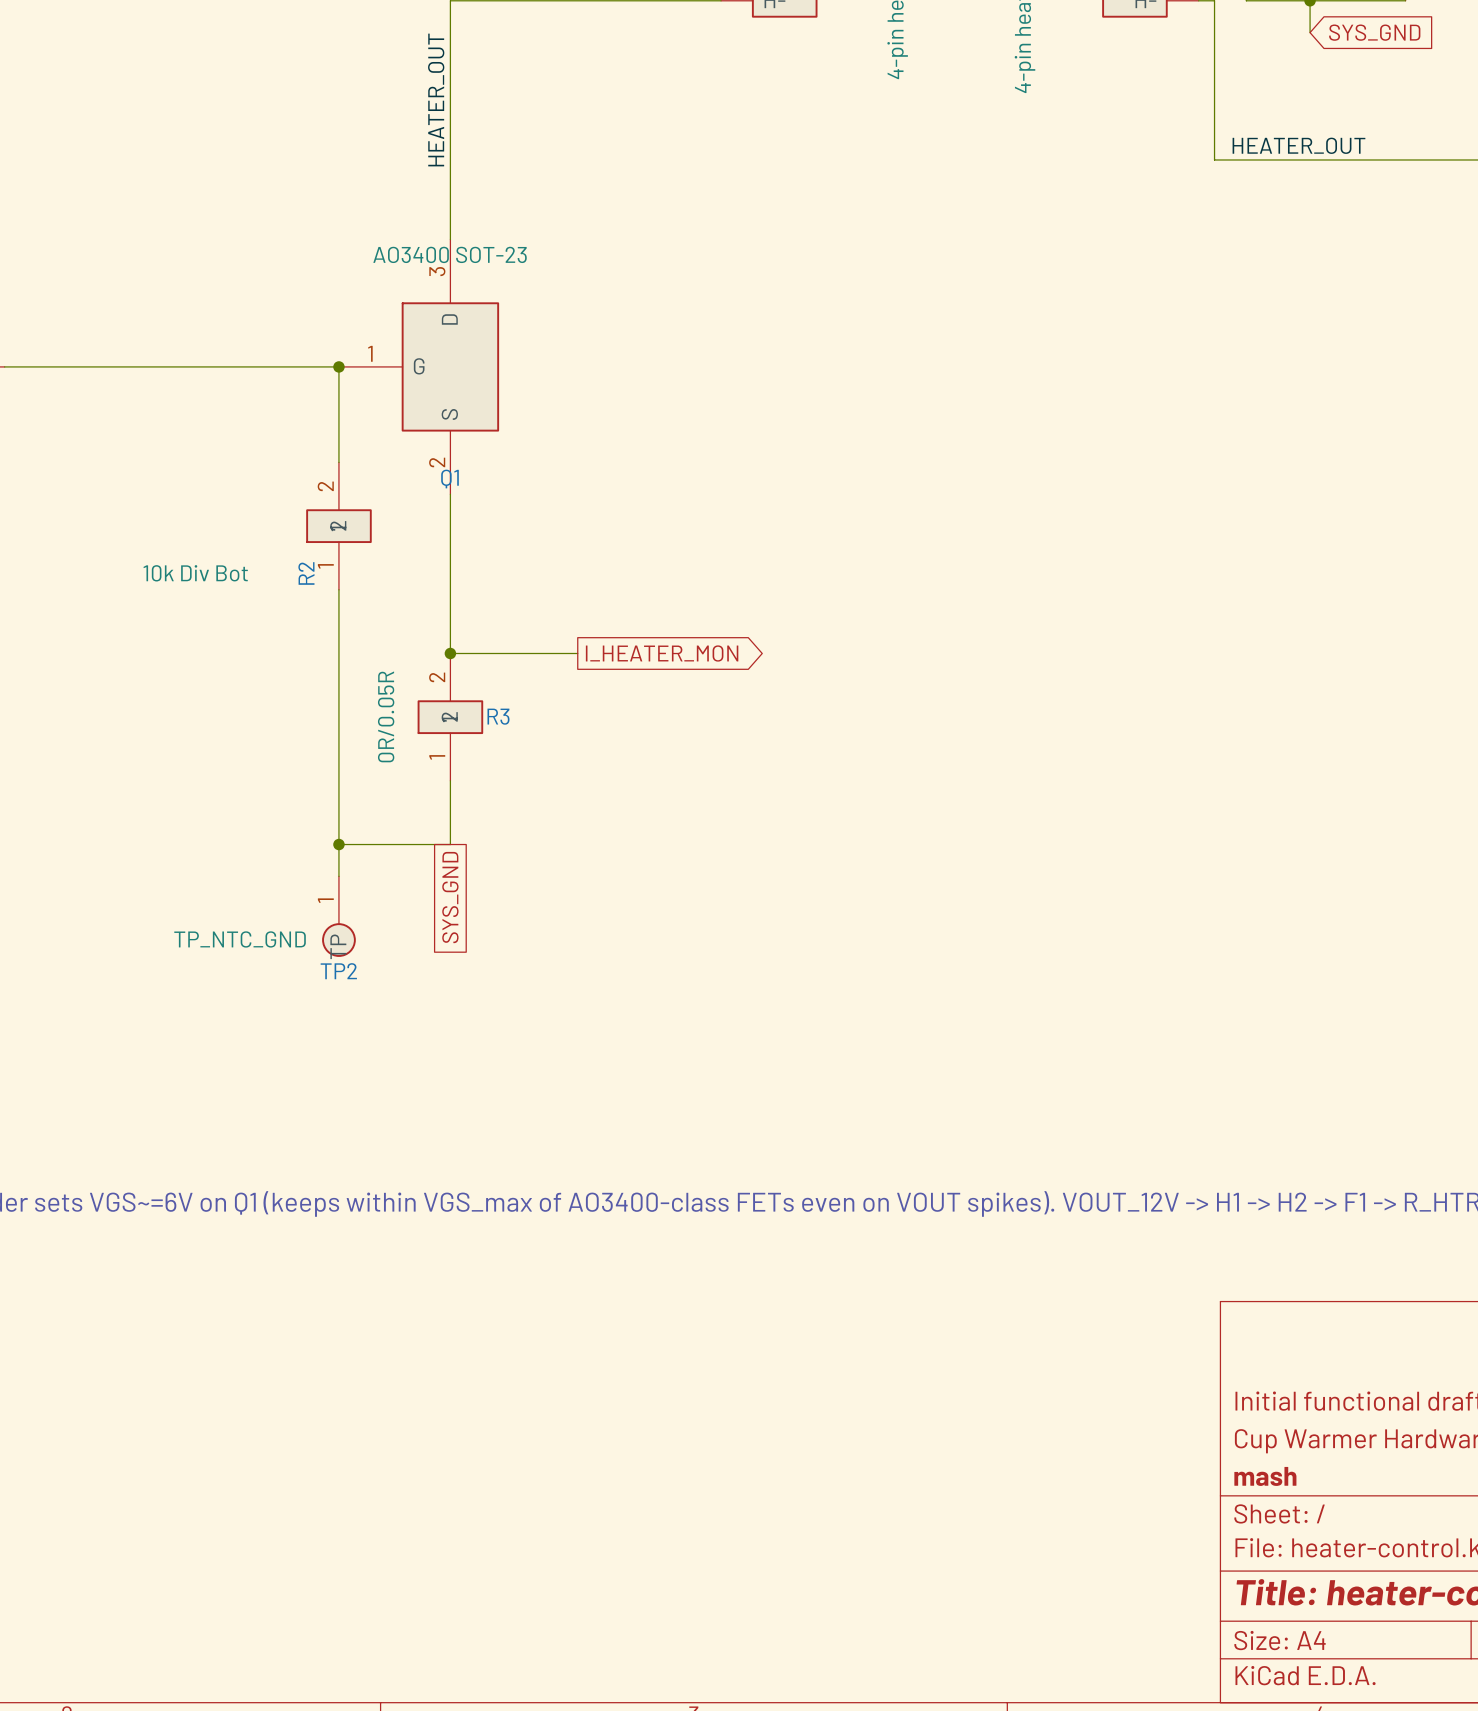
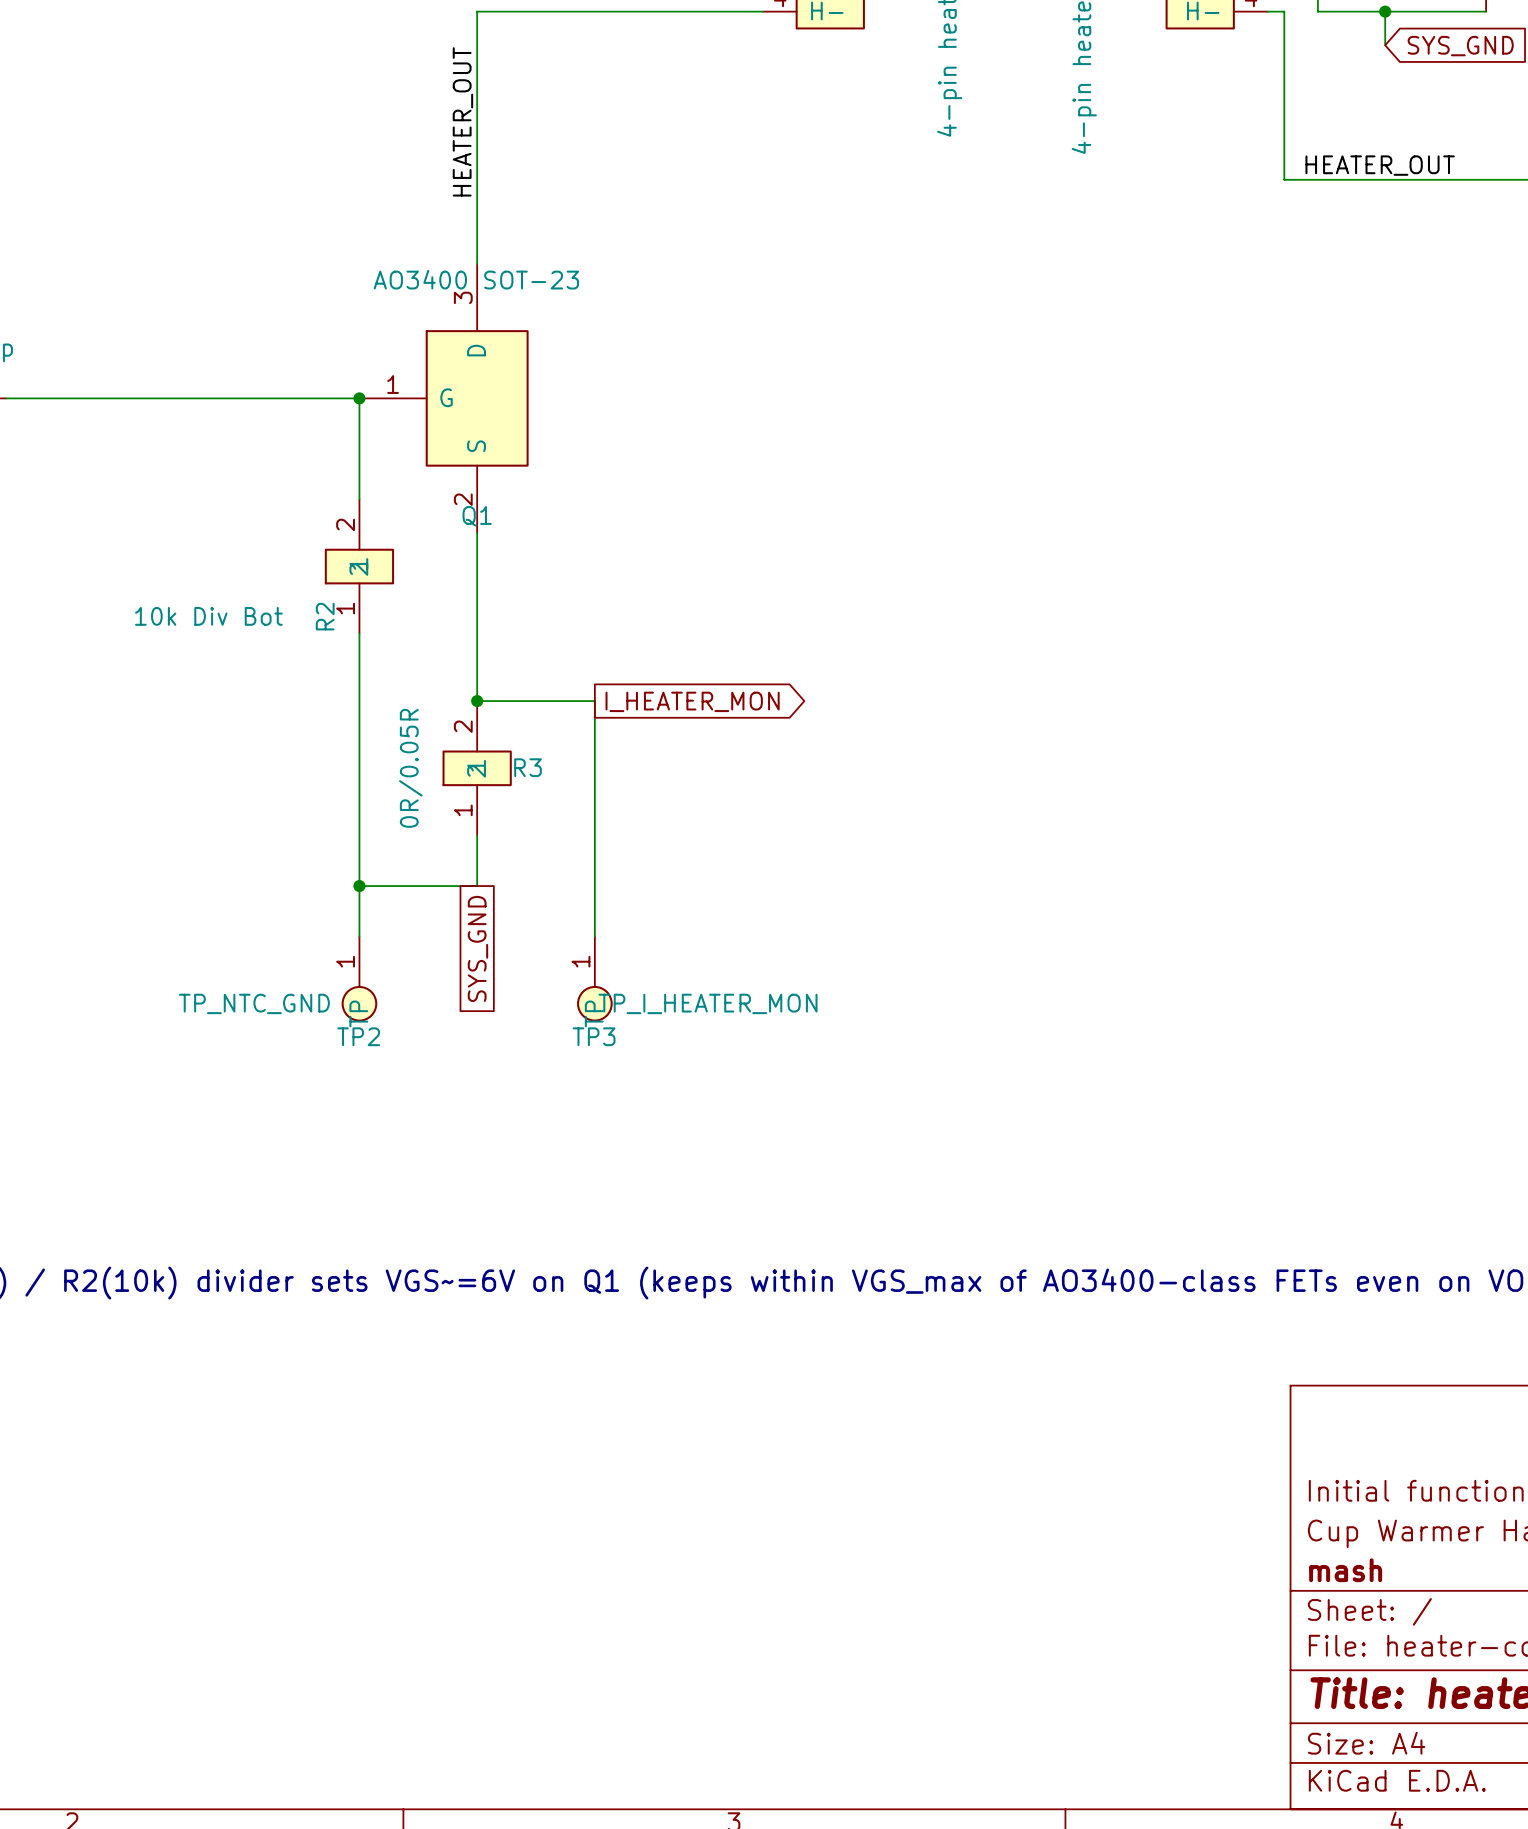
wire: (561, 653) (577, 653) -> (594, 701) (594, 936)
global label position: I_HEATER_MON (662, 653) -> I_HEATER_MON (692, 701)
wire: (450, 828) (450, 844) (338, 844) -> (477, 886) (359, 886)
junction position: (338, 844) -> (359, 886)
global label position: SYS_GND (450, 897) -> SYS_GND (477, 948)
TP3: none -> TP_I_HEATER_MON (594, 979)

